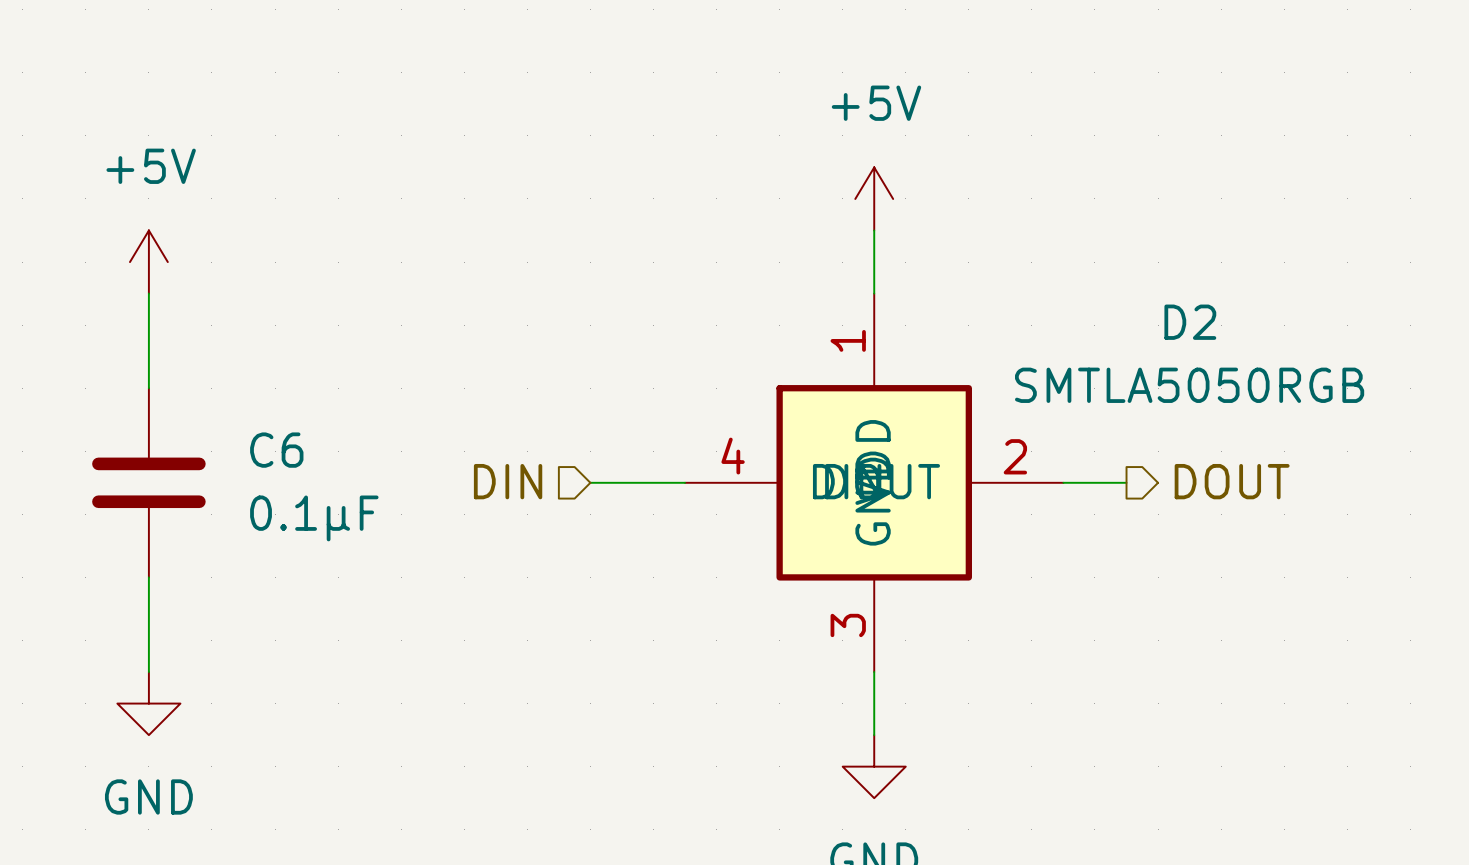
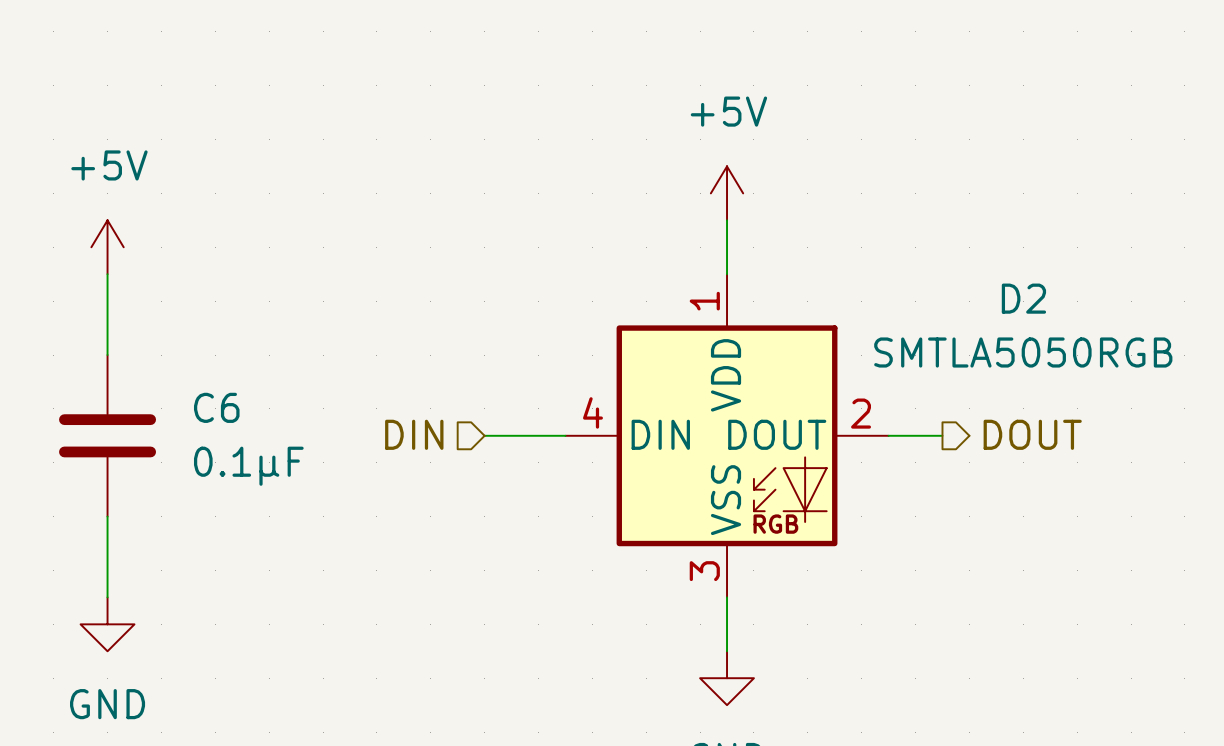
D2 symbol: [685, 293, 1064, 673] -> [565, 274, 889, 598]

